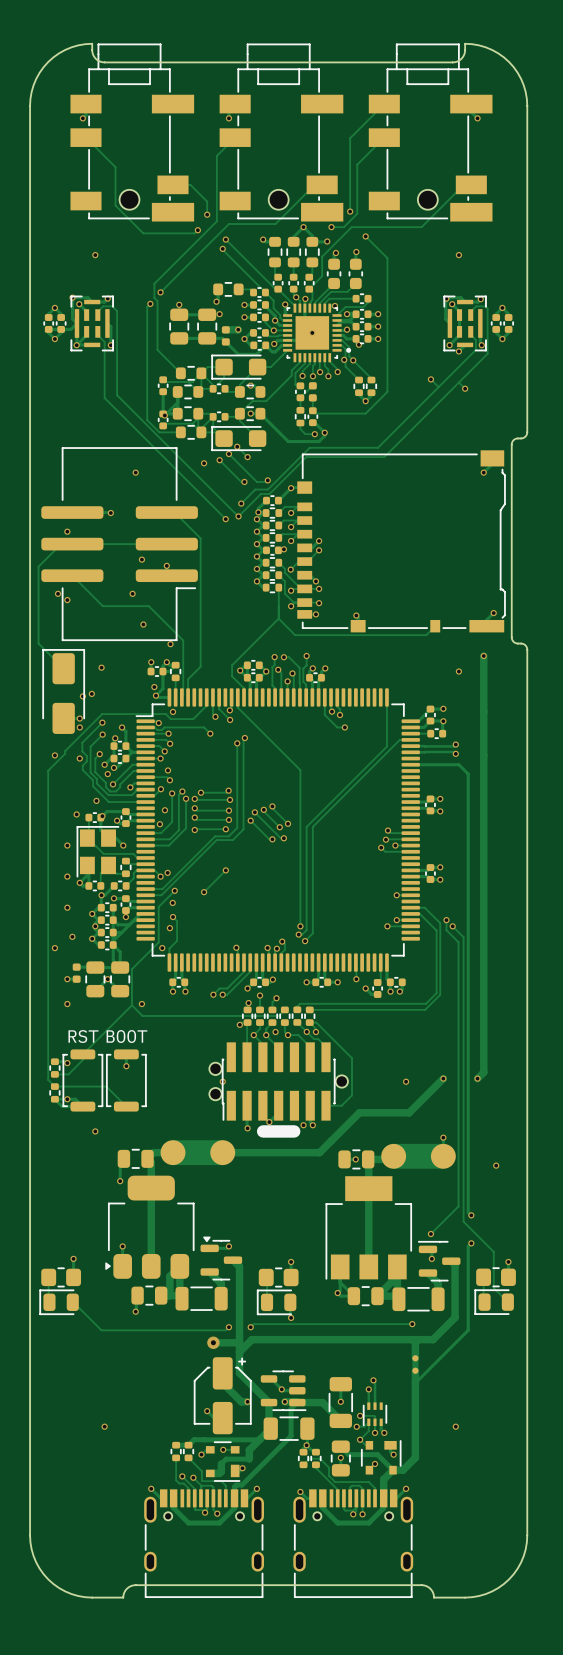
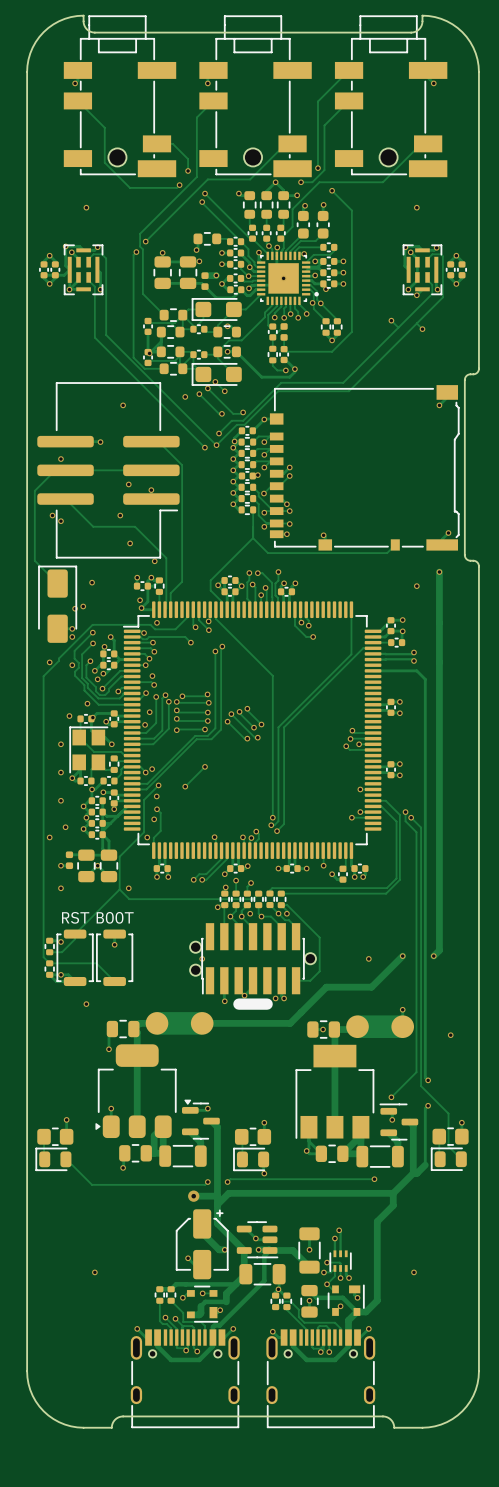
track: (468, 1308) (468, 1330) (415, 1383) -> (425, 1165) (417, 1173) (413, 1173)
track: (418, 1339) (415, 1342) (415, 1358) -> none
track: none -> (393, 1193) (393, 1205) (377, 1221)
part: (415, 1364) -> none

